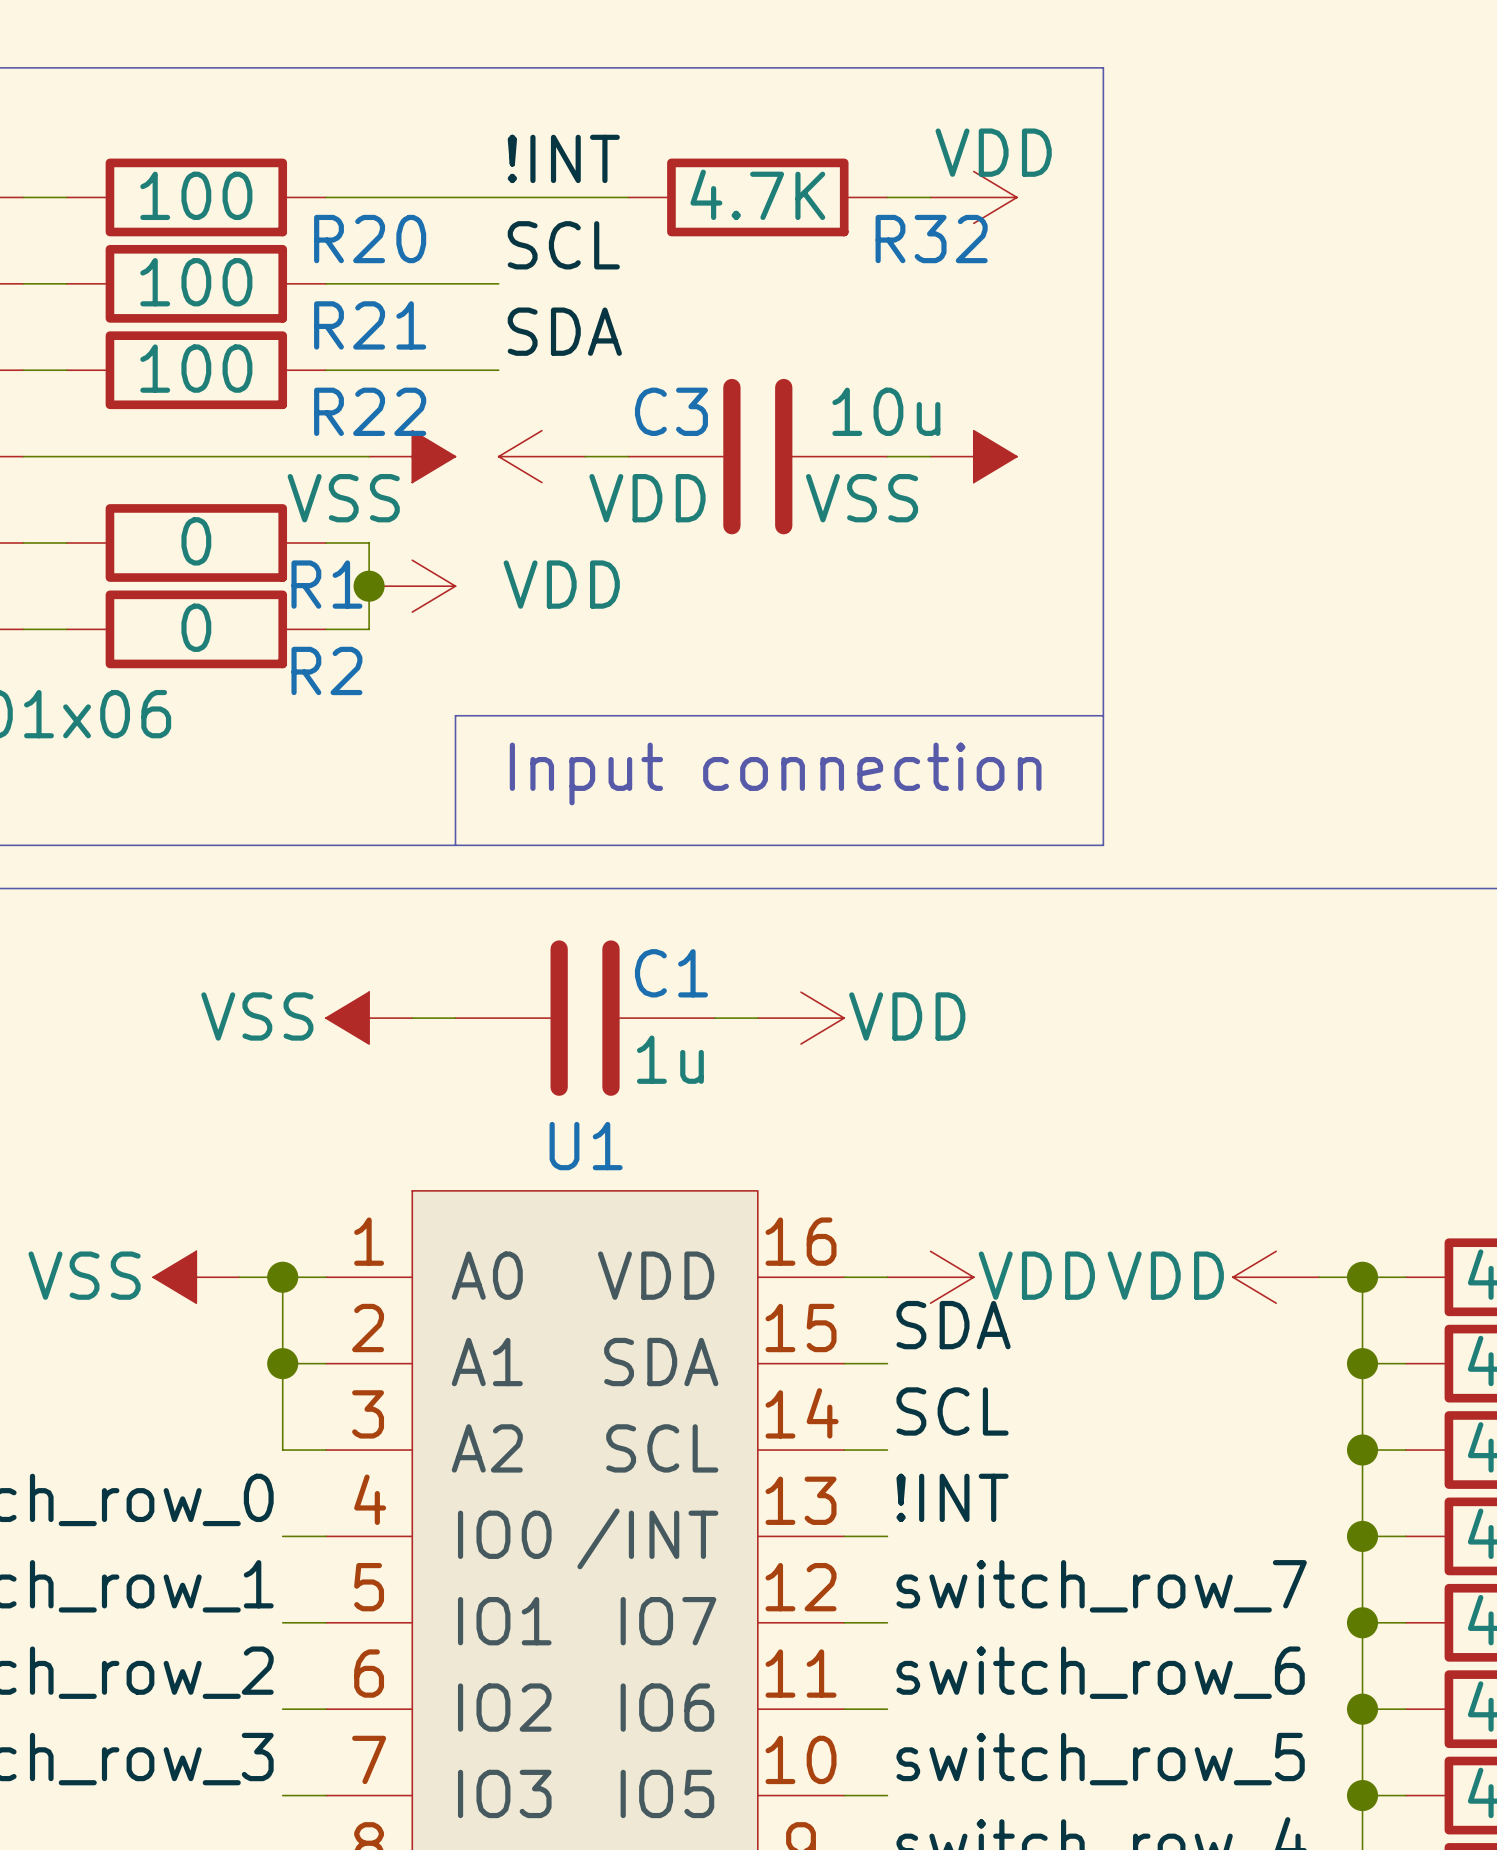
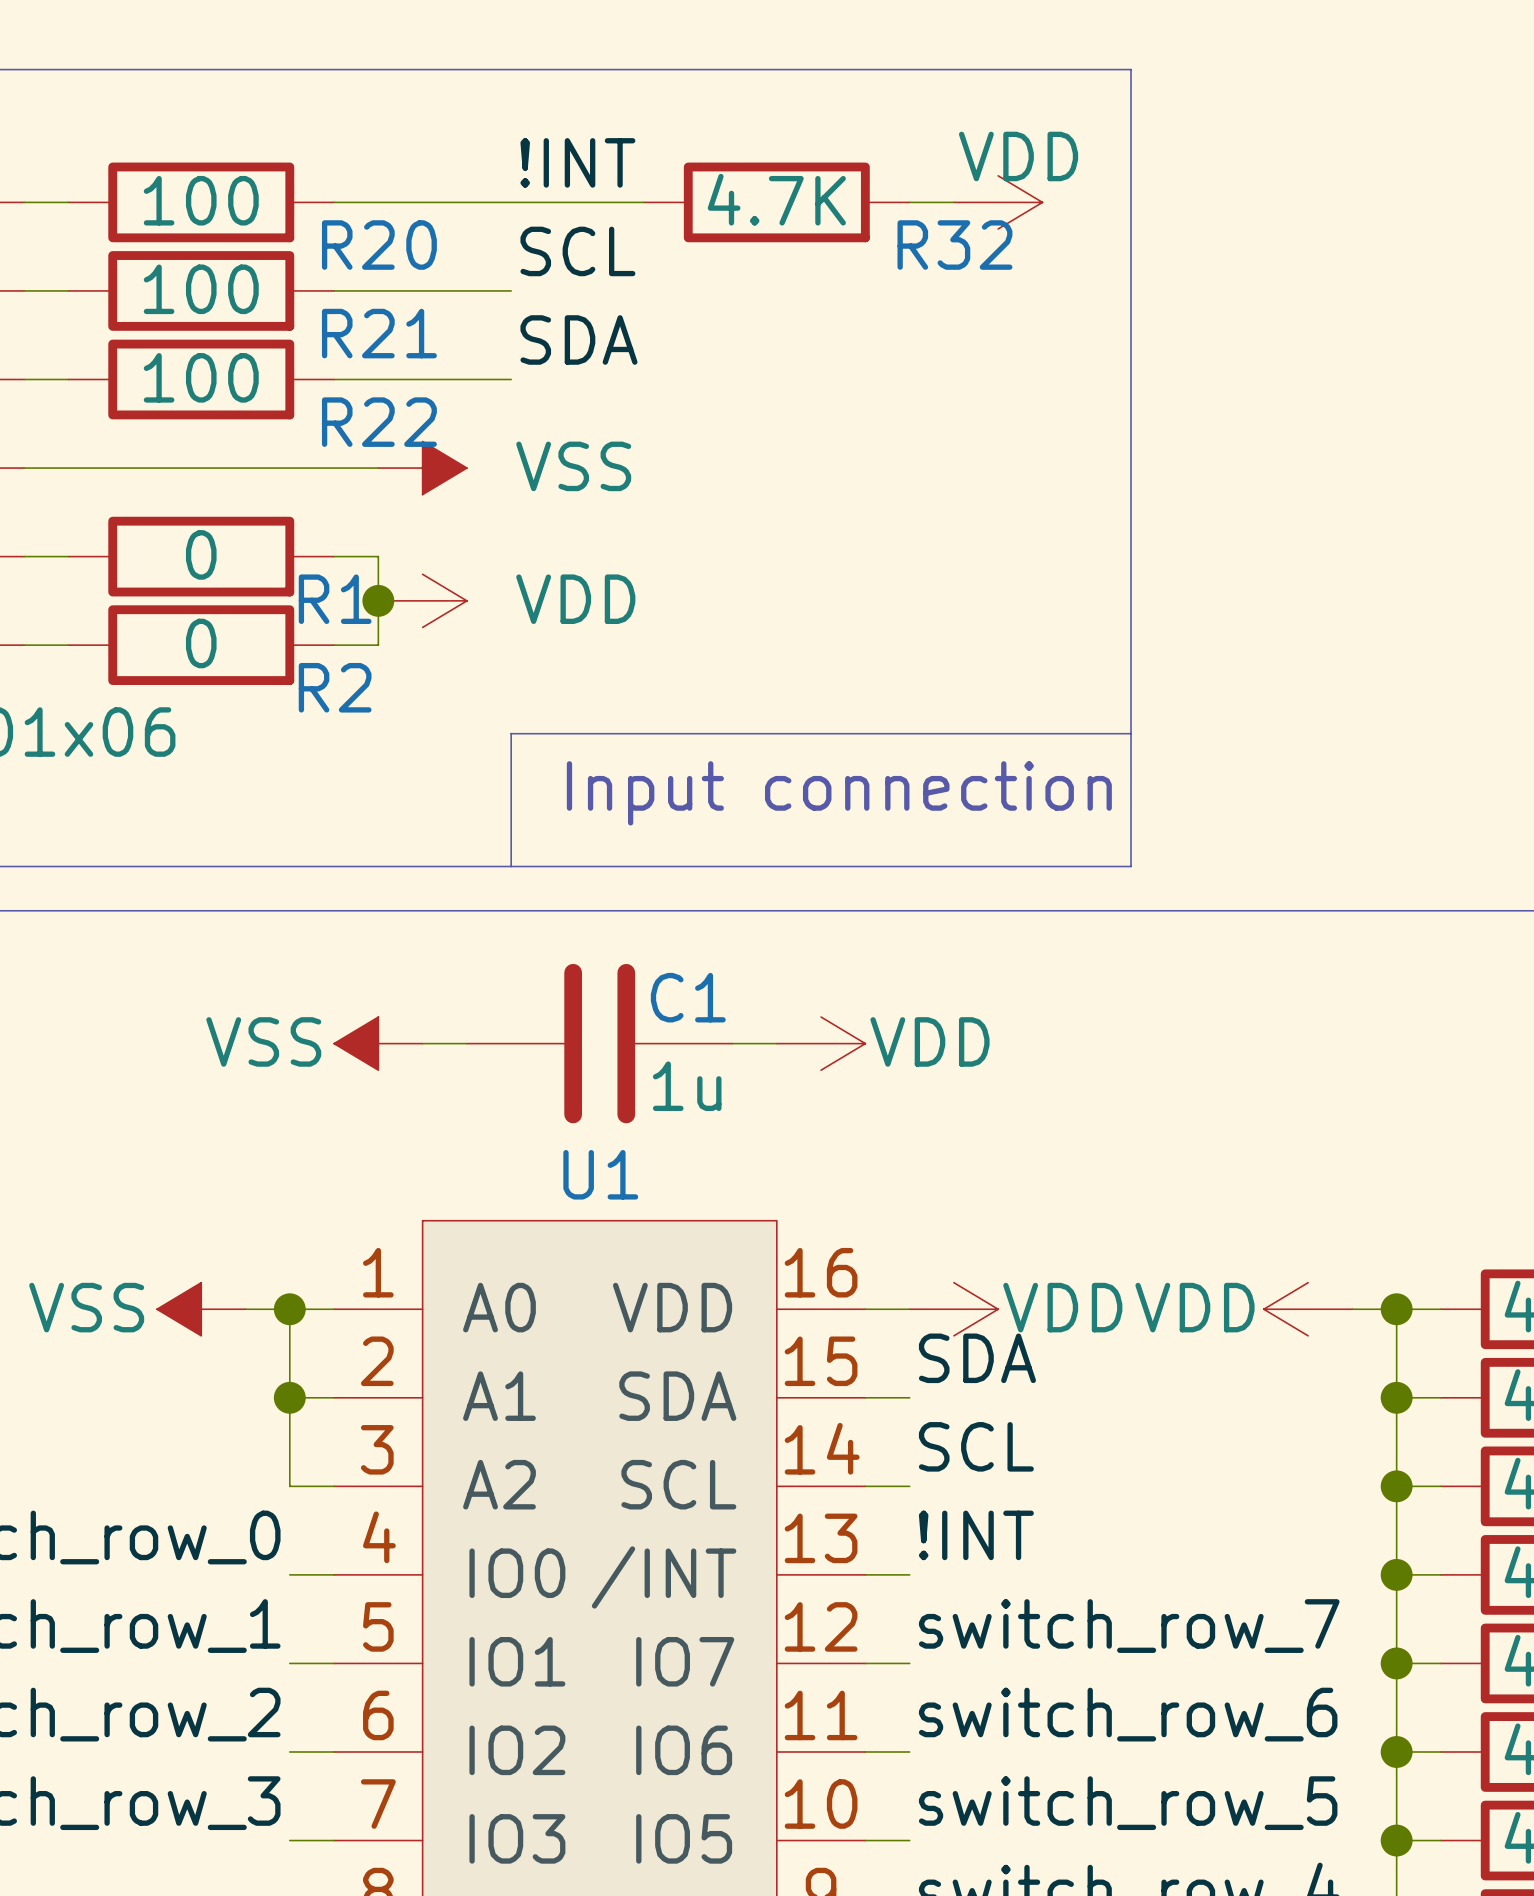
power symbol: VDD (541, 456) -> none
wire: (585, 456) (628, 456) -> none
C3: 10u (757, 456) -> none
wire: (887, 456) (930, 456) -> none
power symbol: VSS (973, 456) -> none
power symbol text position: VSS (343, 498) -> VSS (573, 466)
line: (498, 715) (455, 715) (455, 845) -> (511, 733) (511, 866)
text position: Input connection (775, 773) -> Input connection (839, 793)

